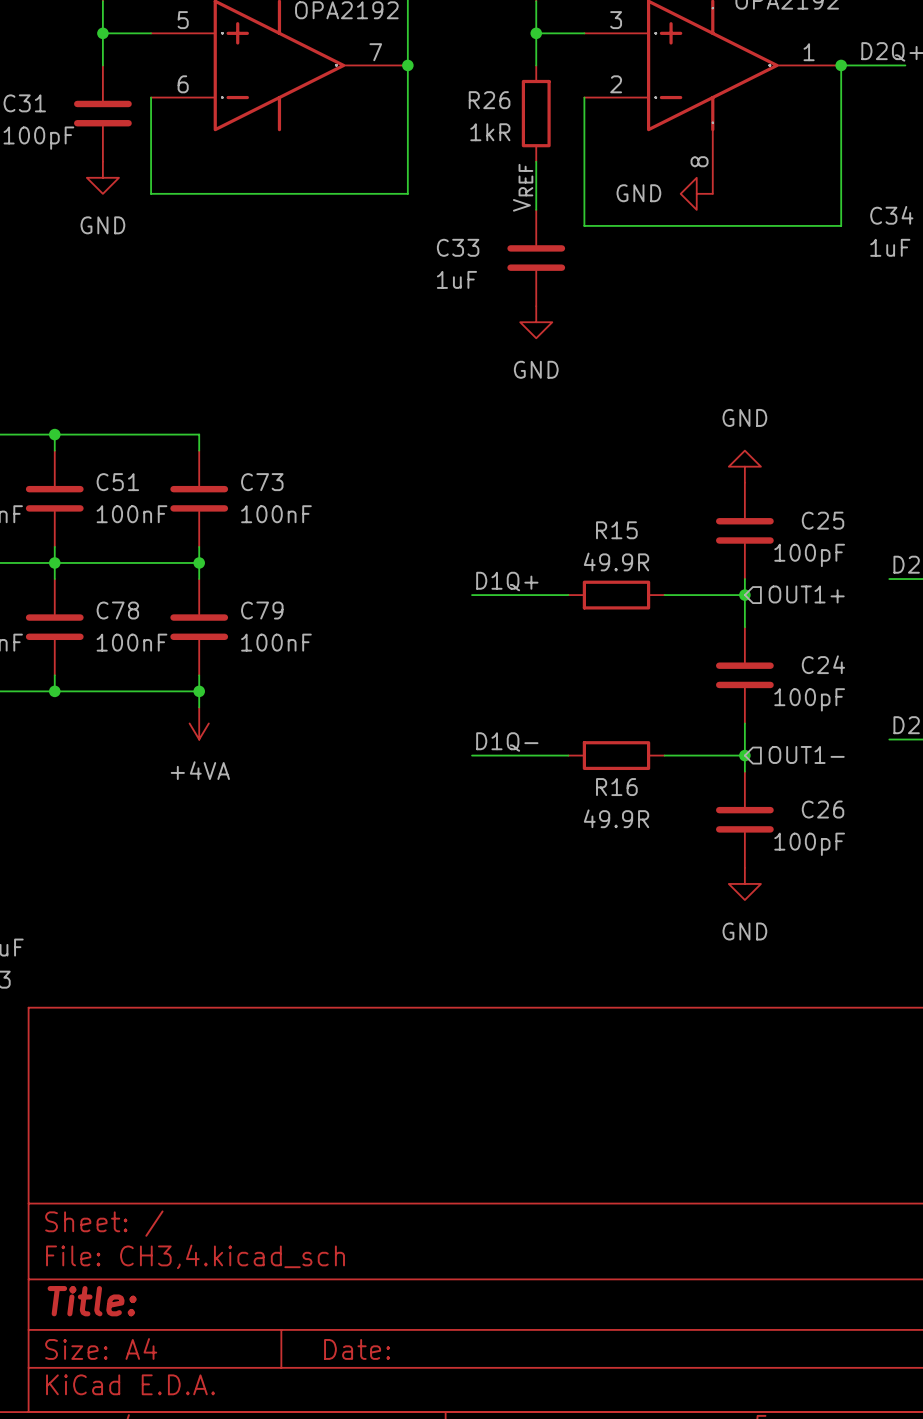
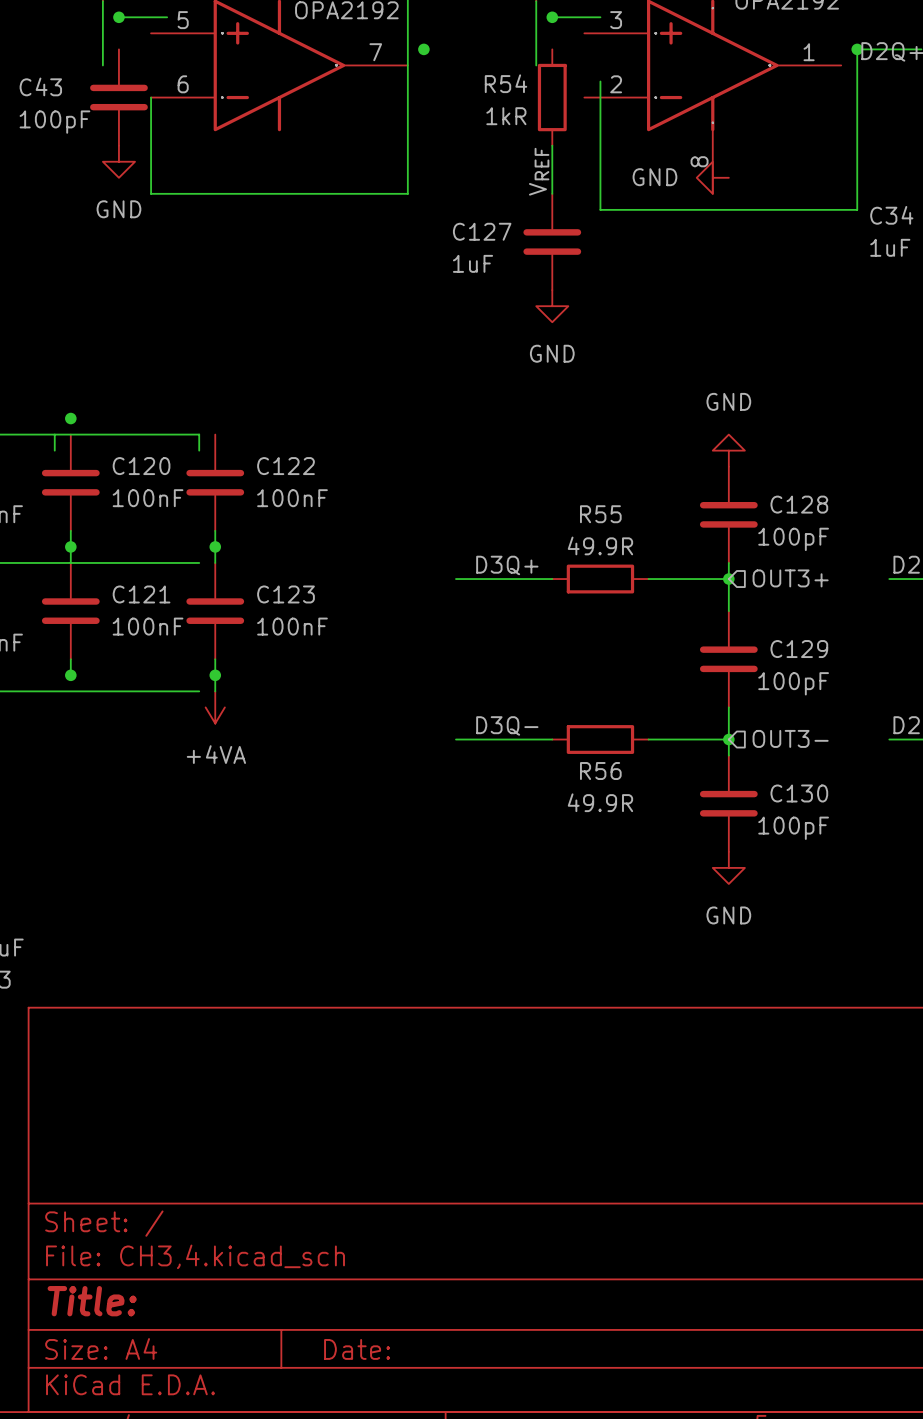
wire: (102, 33) (151, 33) -> (118, 17) (167, 17)
junction position: (102, 33) -> (118, 17)
wire: (536, 33) (584, 33) -> (552, 17) (600, 17)
junction position: (536, 33) -> (552, 17)
junction position: (407, 65) -> (423, 49)
junction position: (841, 65) -> (857, 49)
wire: (905, 65) (841, 65) (841, 225) (584, 225) (584, 97) -> (921, 49) (857, 49) (857, 209) (600, 209) (600, 81)
C43: none -> 100pF (118, 97)
R54: none -> 1kR (552, 97)
C31: 100pF (102, 113) -> none
R26: 1kR (536, 113) -> none
wire: (536, 161) (536, 209) -> (552, 145) (552, 193)
power symbol position: GND (102, 177) -> GND (118, 161)
label position: VREF (523, 187) -> VREF (539, 171)
power symbol position: GND (696, 193) -> GND (712, 177)
C127: none -> 1uF (552, 241)
C33: 1uF (536, 258) -> none
power symbol position: GND (536, 322) -> GND (552, 306)
junction position: (54, 434) -> (70, 418)
power symbol position: GND (744, 466) -> GND (728, 450)
C120: none -> 100nF (70, 482)
C122: none -> 100nF (215, 482)
C51: 100nF (54, 498) -> none
C73: 100nF (199, 498) -> none
C128: none -> 100pF (728, 514)
C25: 100pF (744, 530) -> none
wire: (54, 546) (54, 579) -> (70, 530) (70, 562)
wire: (199, 546) (199, 579) -> (215, 530) (215, 562)
junction position: (54, 562) -> (70, 546)
junction position: (199, 562) -> (215, 546)
R55: none -> 49.9R (600, 579)
wire: (744, 579) (744, 627) -> (728, 562) (728, 611)
label: D1Q+ (507, 581) -> D3Q+ (507, 565)
hierarchical label: OUT1+ (806, 594) -> OUT3+ (790, 578)
wire: (472, 595) (568, 595) -> (456, 579) (552, 579)
R15: 49.9R (616, 595) -> none
wire: (664, 595) (744, 595) -> (648, 579) (728, 579)
junction position: (744, 595) -> (728, 579)
C121: none -> 100nF (70, 611)
C123: none -> 100nF (215, 611)
C78: 100nF (54, 627) -> none
C79: 100nF (199, 627) -> none
C129: none -> 100pF (728, 659)
wire: (54, 675) (54, 691) -> (70, 659) (70, 675)
wire: (199, 675) (199, 707) -> (215, 659) (215, 691)
C24: 100pF (744, 675) -> none
junction position: (54, 691) -> (70, 675)
junction position: (199, 691) -> (215, 675)
power symbol position: +4VA (199, 723) -> +4VA (215, 707)
wire: (744, 723) (744, 771) -> (728, 707) (728, 755)
R56: none -> 49.9R (600, 739)
label: D1Q- (507, 742) -> D3Q- (507, 725)
hierarchical label: OUT1- (806, 754) -> OUT3- (790, 738)
wire: (472, 755) (568, 755) -> (456, 739) (552, 739)
R16: 49.9R (616, 755) -> none
wire: (664, 755) (744, 755) -> (648, 739) (728, 739)
junction position: (744, 755) -> (728, 739)
C130: none -> 100pF (728, 803)
C26: 100pF (744, 819) -> none
power symbol position: GND (744, 883) -> GND (728, 867)

